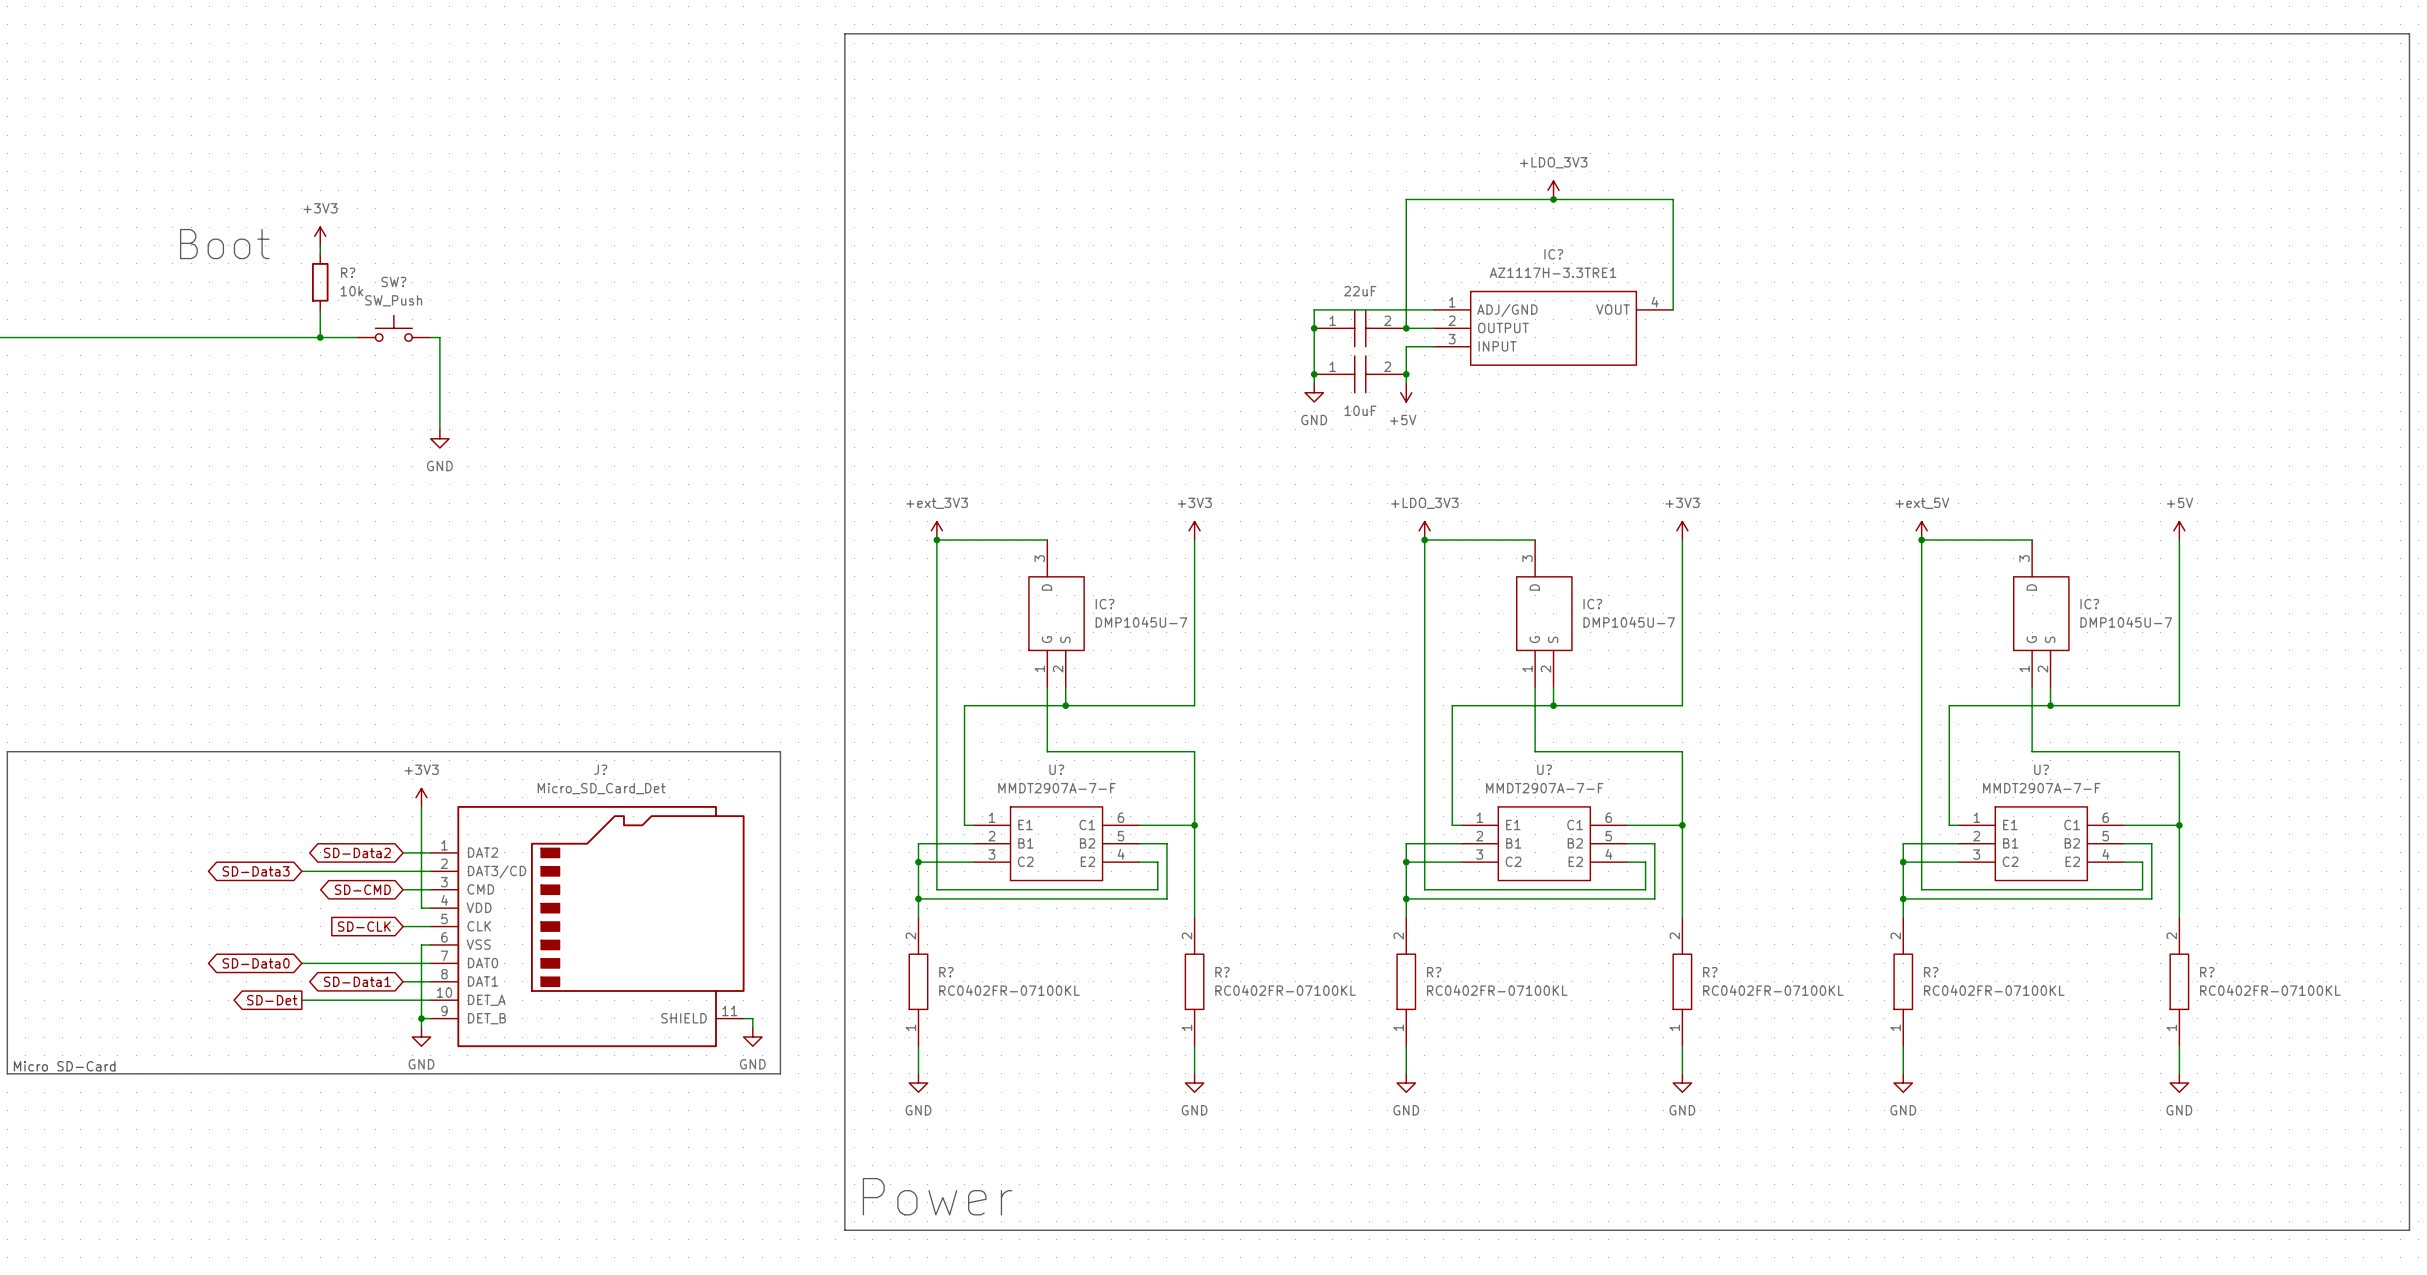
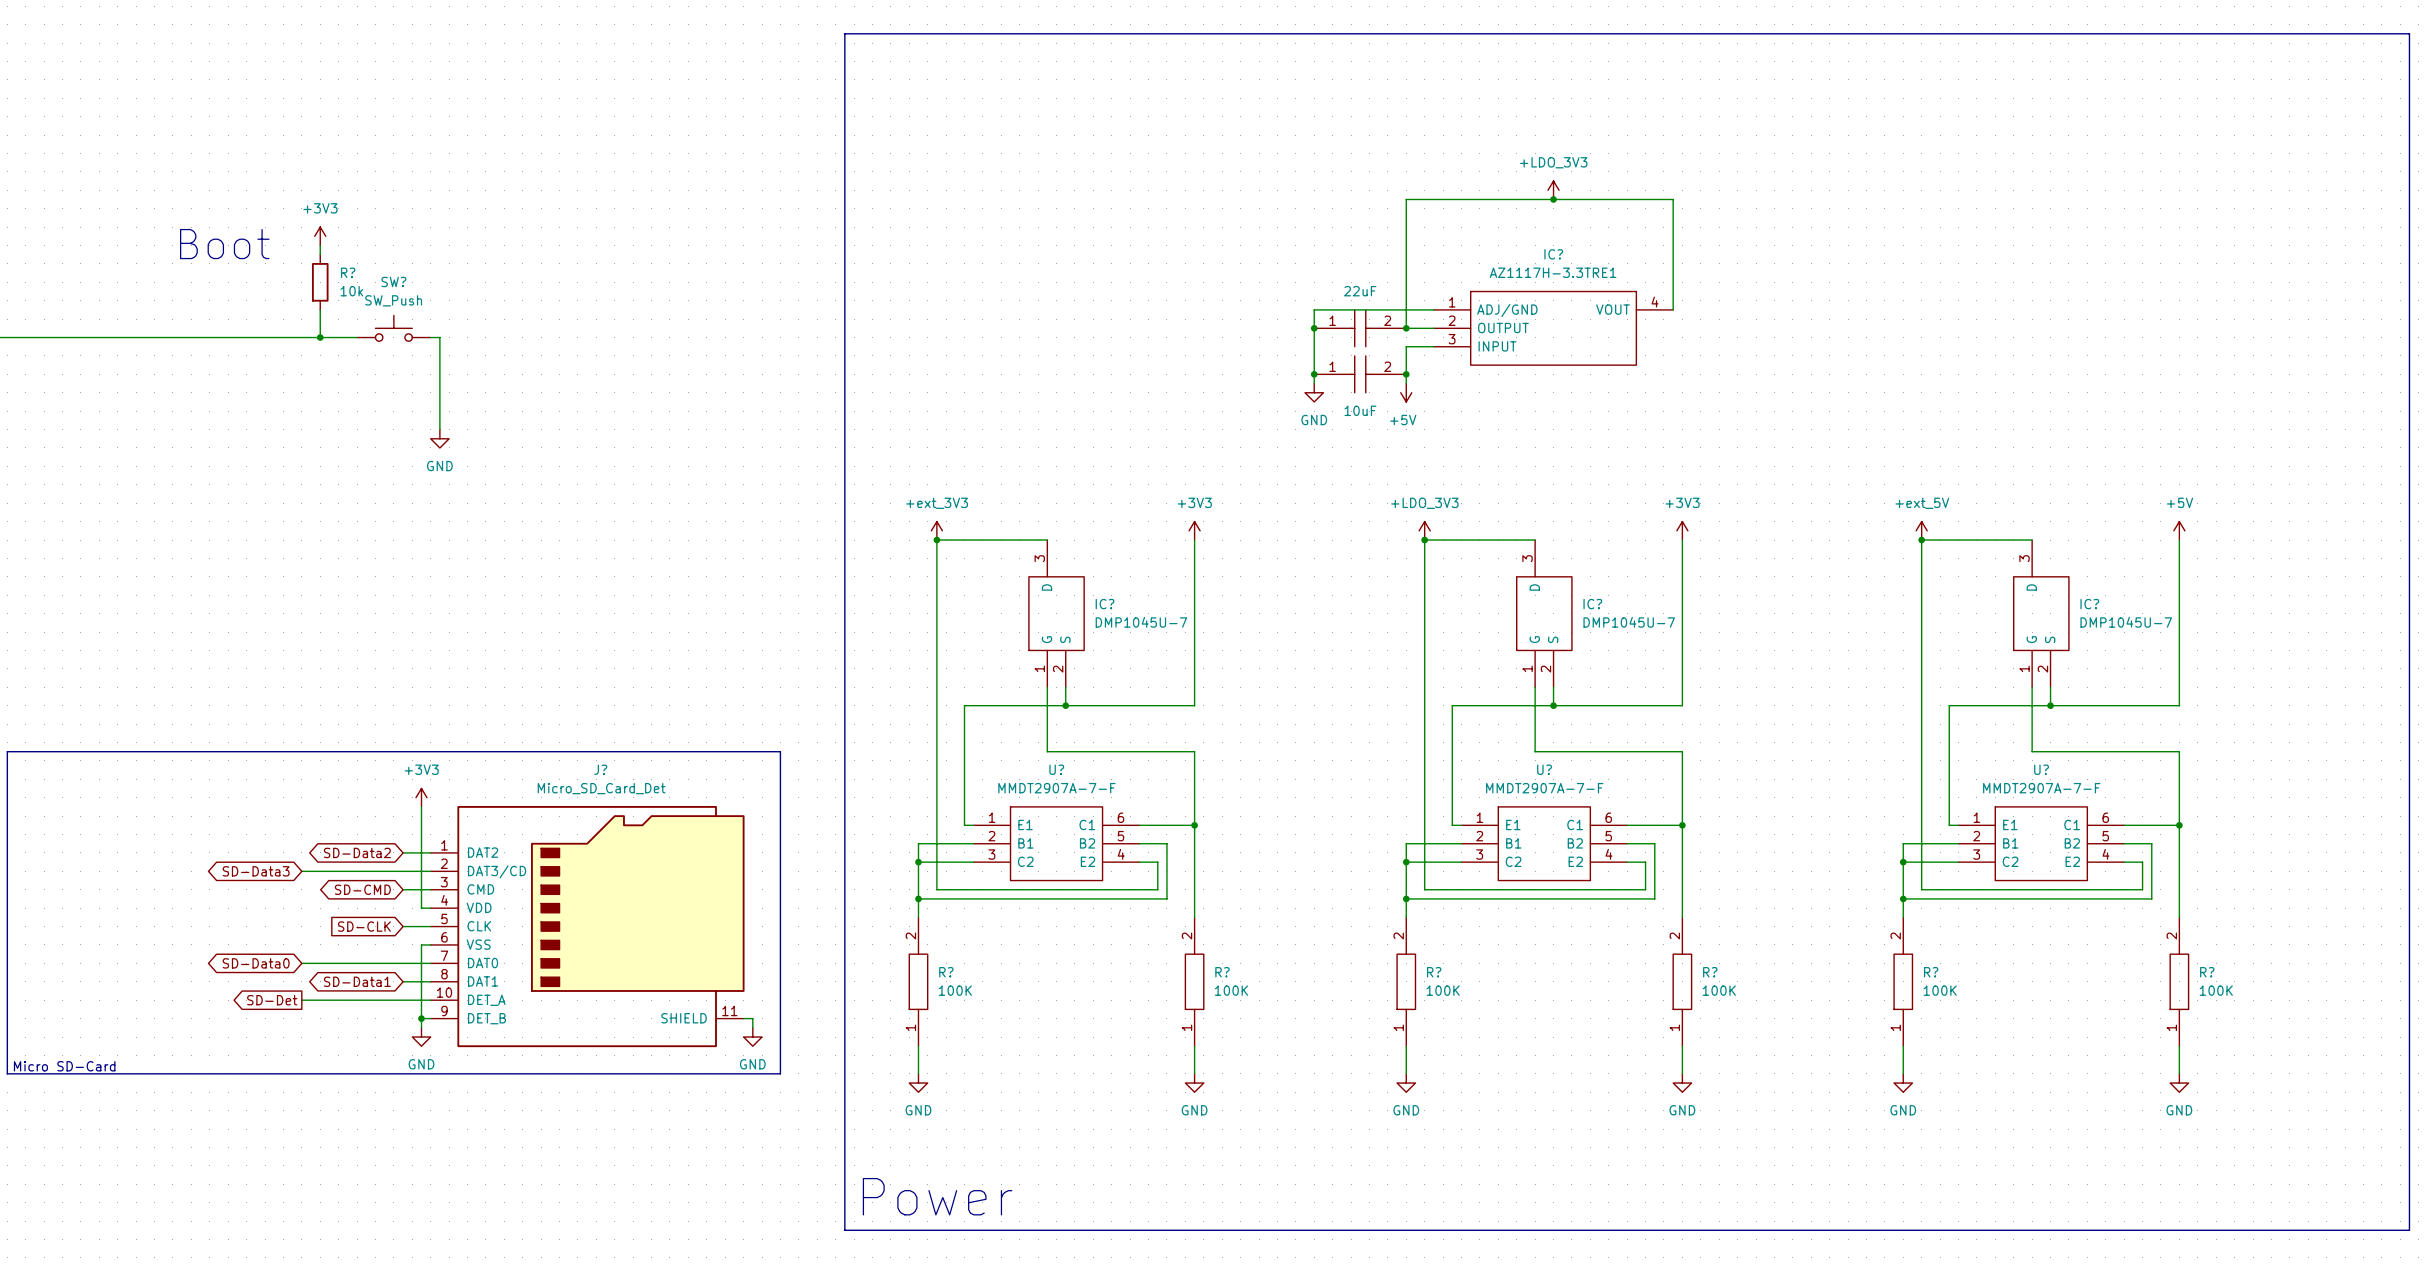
R? value: RC0402FR-07100KL (1009, 990) -> 100K (955, 990)
R? value: RC0402FR-07100KL (1285, 990) -> 100K (1231, 990)
R? value: RC0402FR-07100KL (1497, 990) -> 100K (1443, 990)
R? value: RC0402FR-07100KL (1773, 990) -> 100K (1719, 990)
R? value: RC0402FR-07100KL (1994, 990) -> 100K (1940, 990)
R? value: RC0402FR-07100KL (2270, 990) -> 100K (2216, 990)

